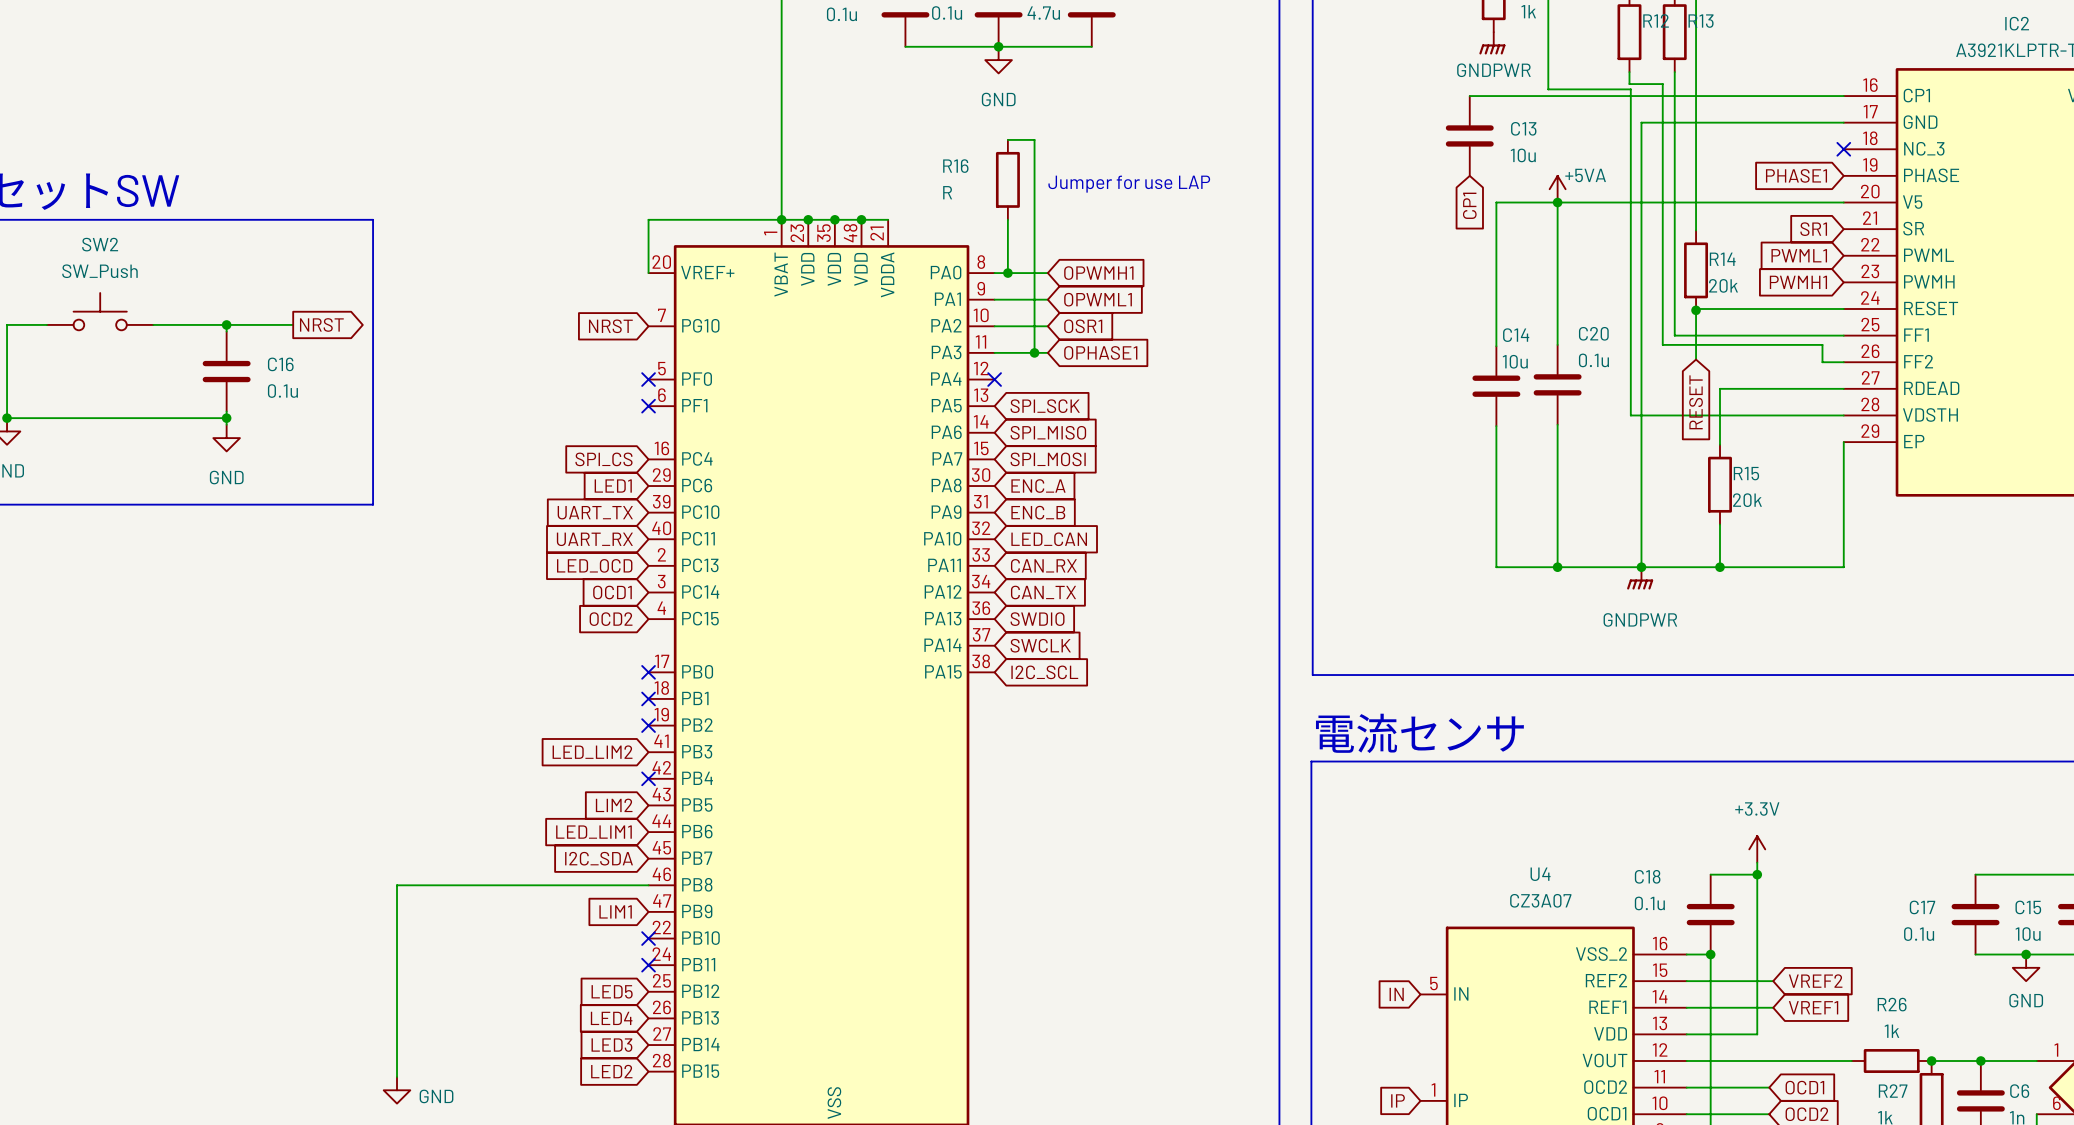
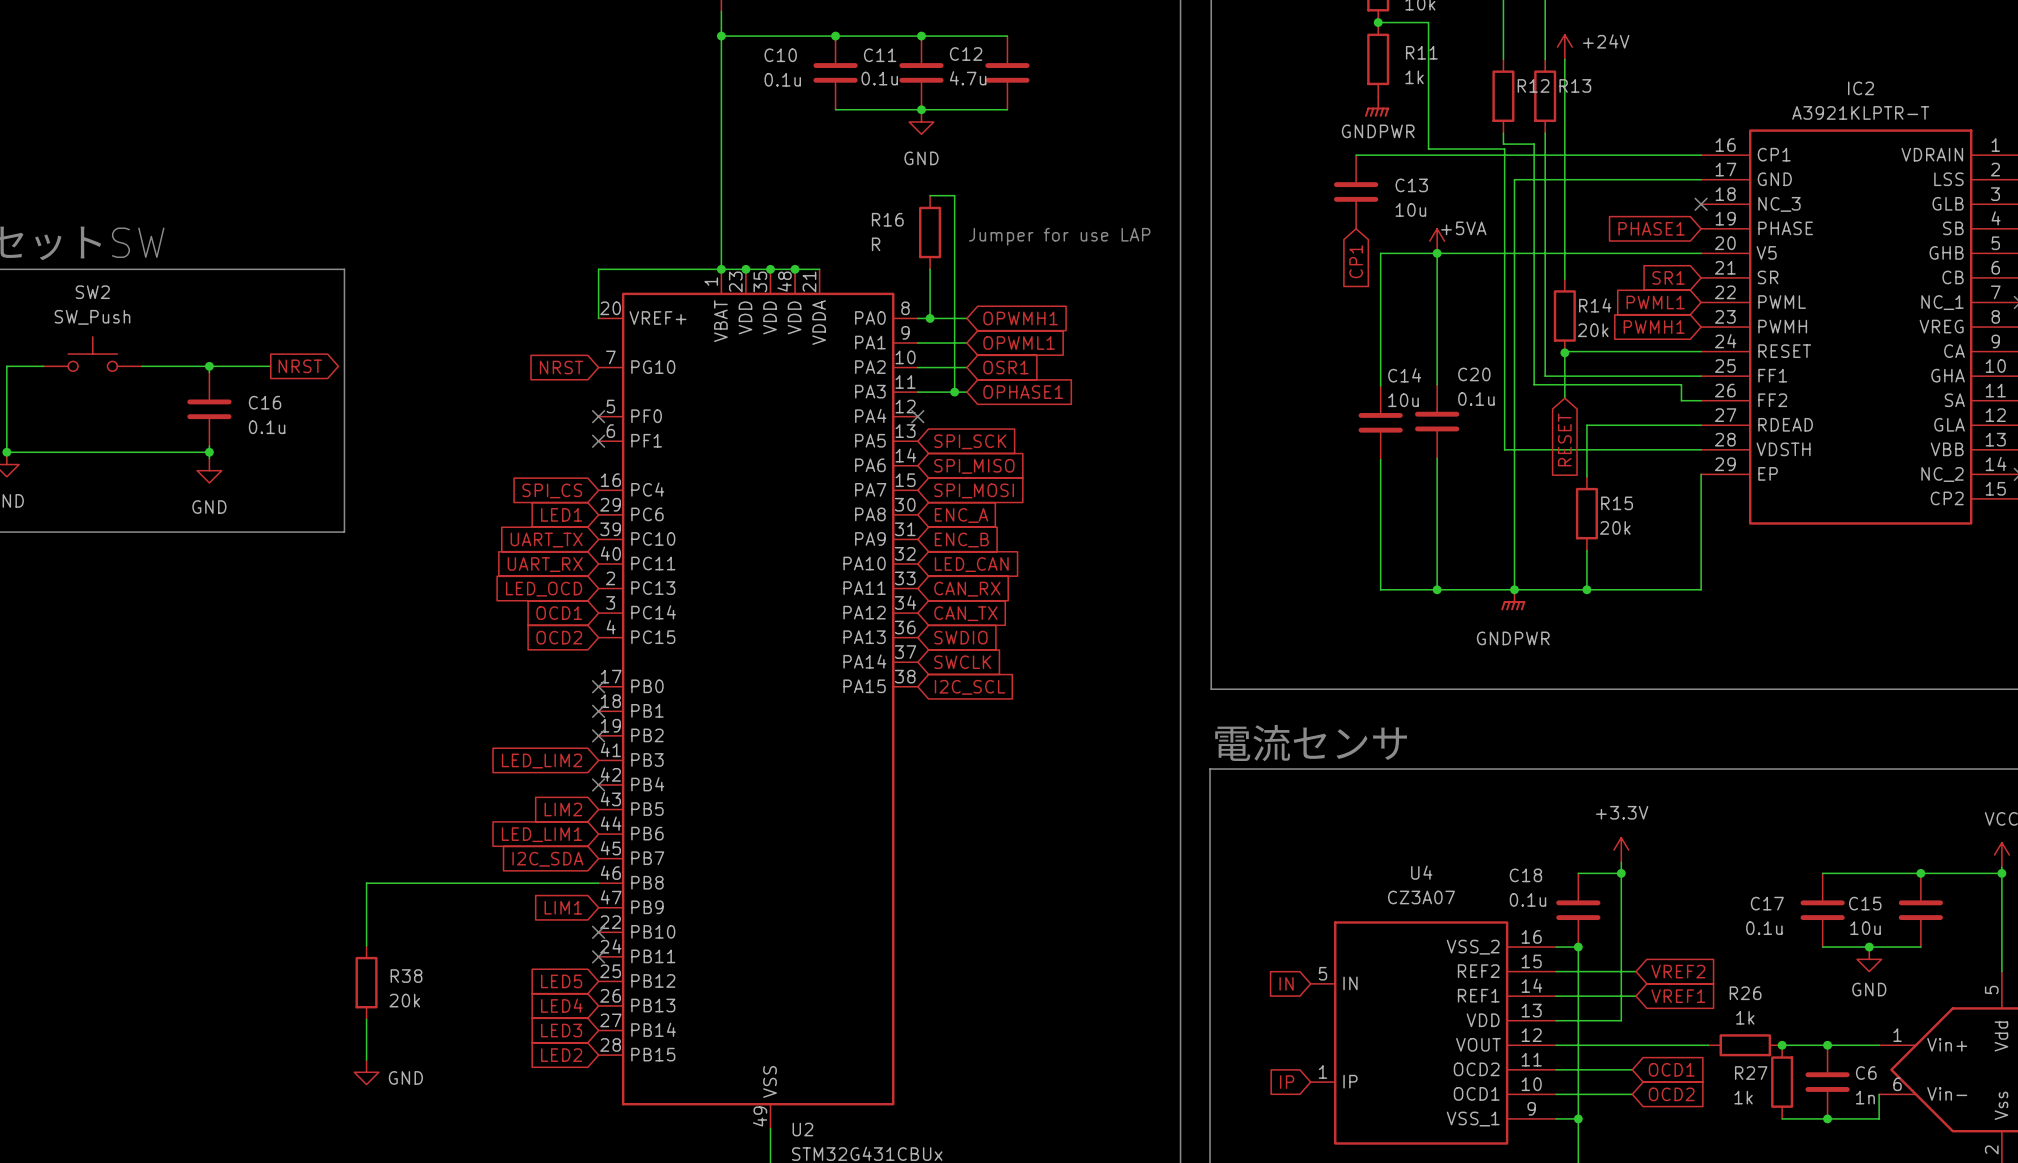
wire: (397, 953) (397, 1033) -> none
R38: none -> 20k (366, 982)

